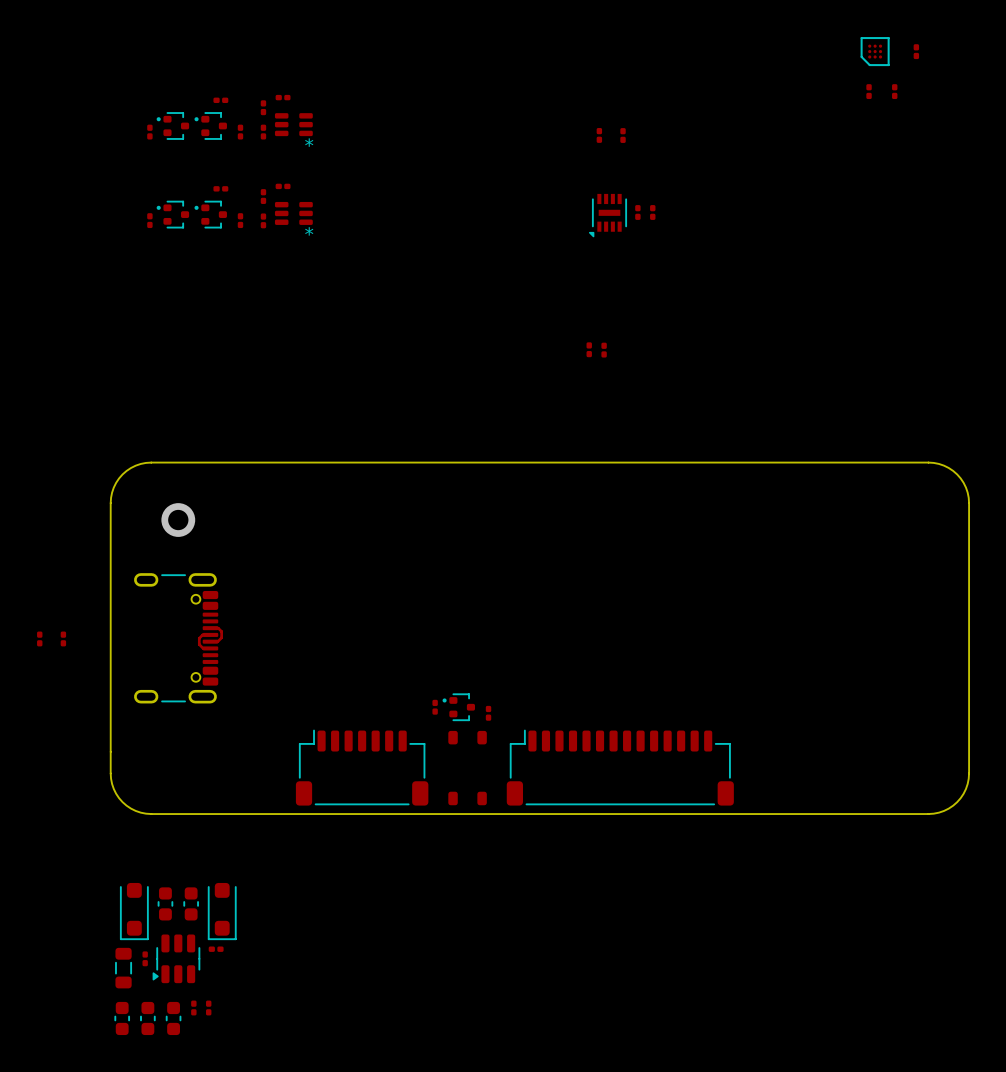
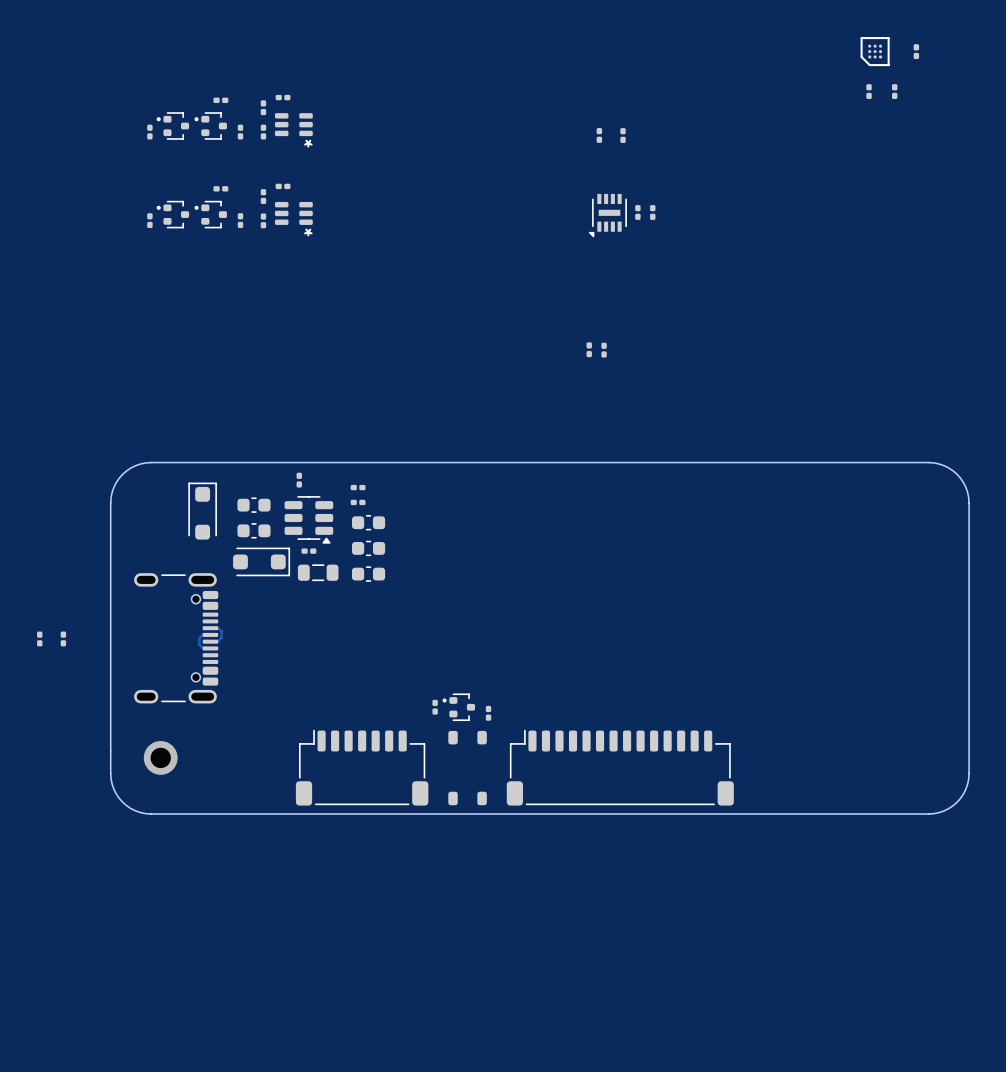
part: none -> (299, 480)
part: none -> (358, 487)
part: none -> (358, 502)
part: none -> (253, 505)
part: none -> (202, 511)
part: none -> (308, 519)
via: (178, 520) -> none
part: none -> (368, 522)
part: none -> (253, 530)
part: none -> (368, 548)
part: none -> (308, 551)
part: none -> (261, 561)
part: none -> (318, 572)
part: none -> (368, 574)
via: none -> (160, 757)
part: (165, 903) -> none
part: (191, 903) -> none
part: (134, 911) -> none
part: (222, 911) -> none
part: (216, 949) -> none
part: (145, 958) -> none
part: (176, 958) -> none
part: (123, 968) -> none
part: (193, 1008) -> none
part: (208, 1008) -> none
part: (122, 1018) -> none
part: (147, 1018) -> none
part: (173, 1018) -> none

